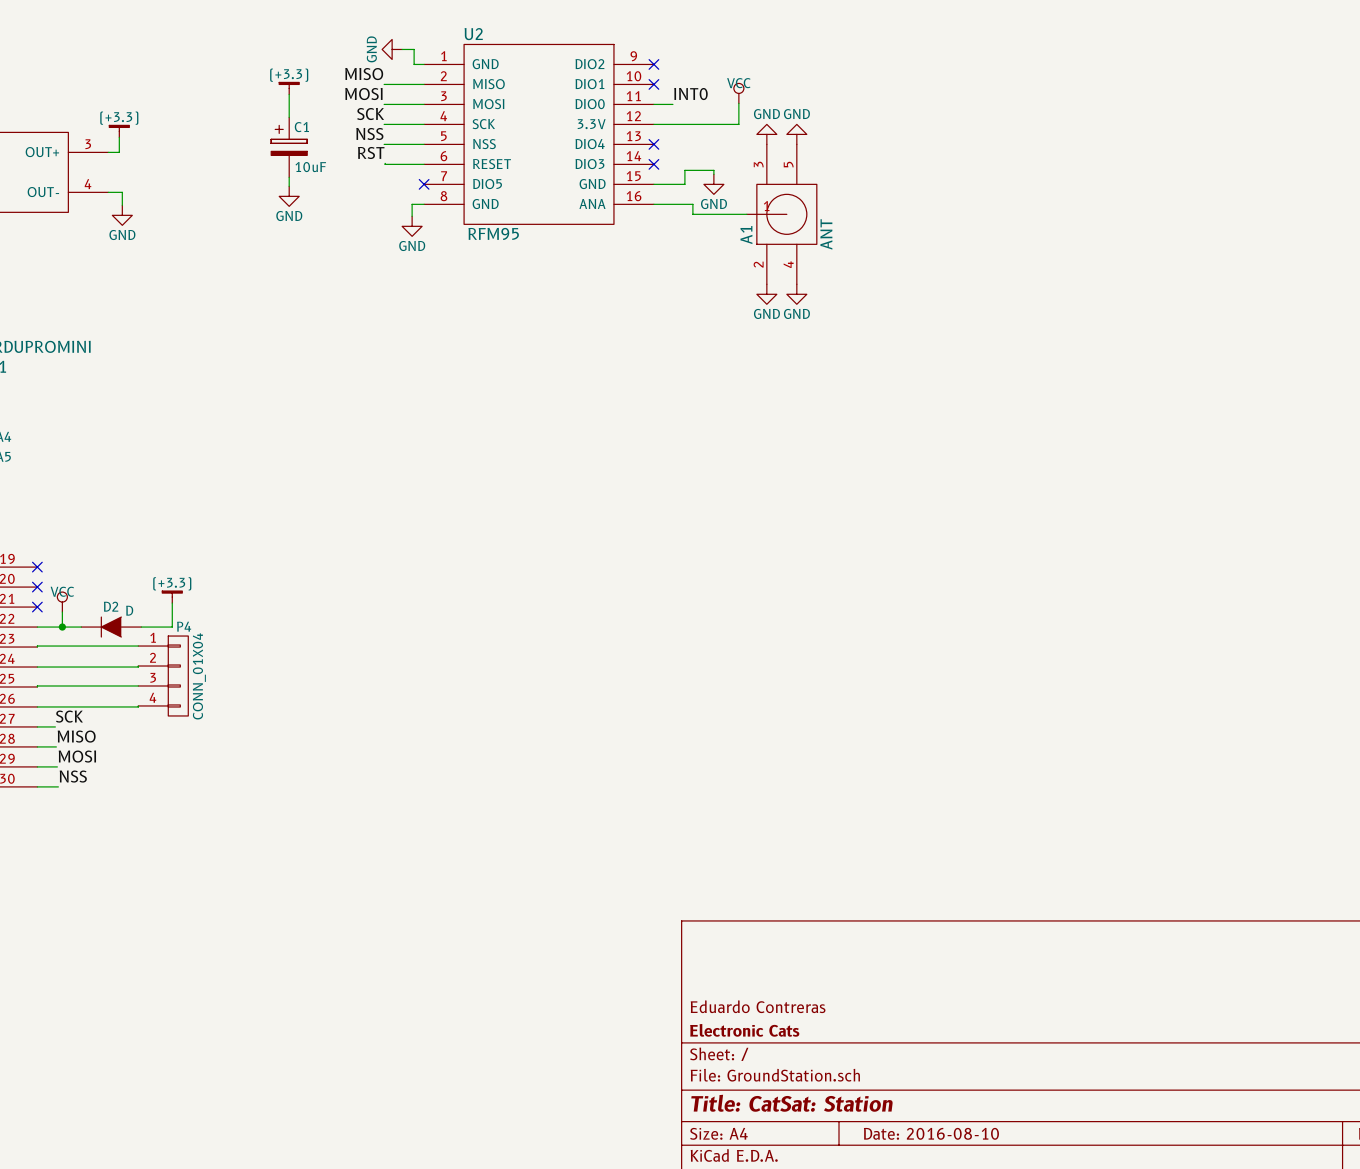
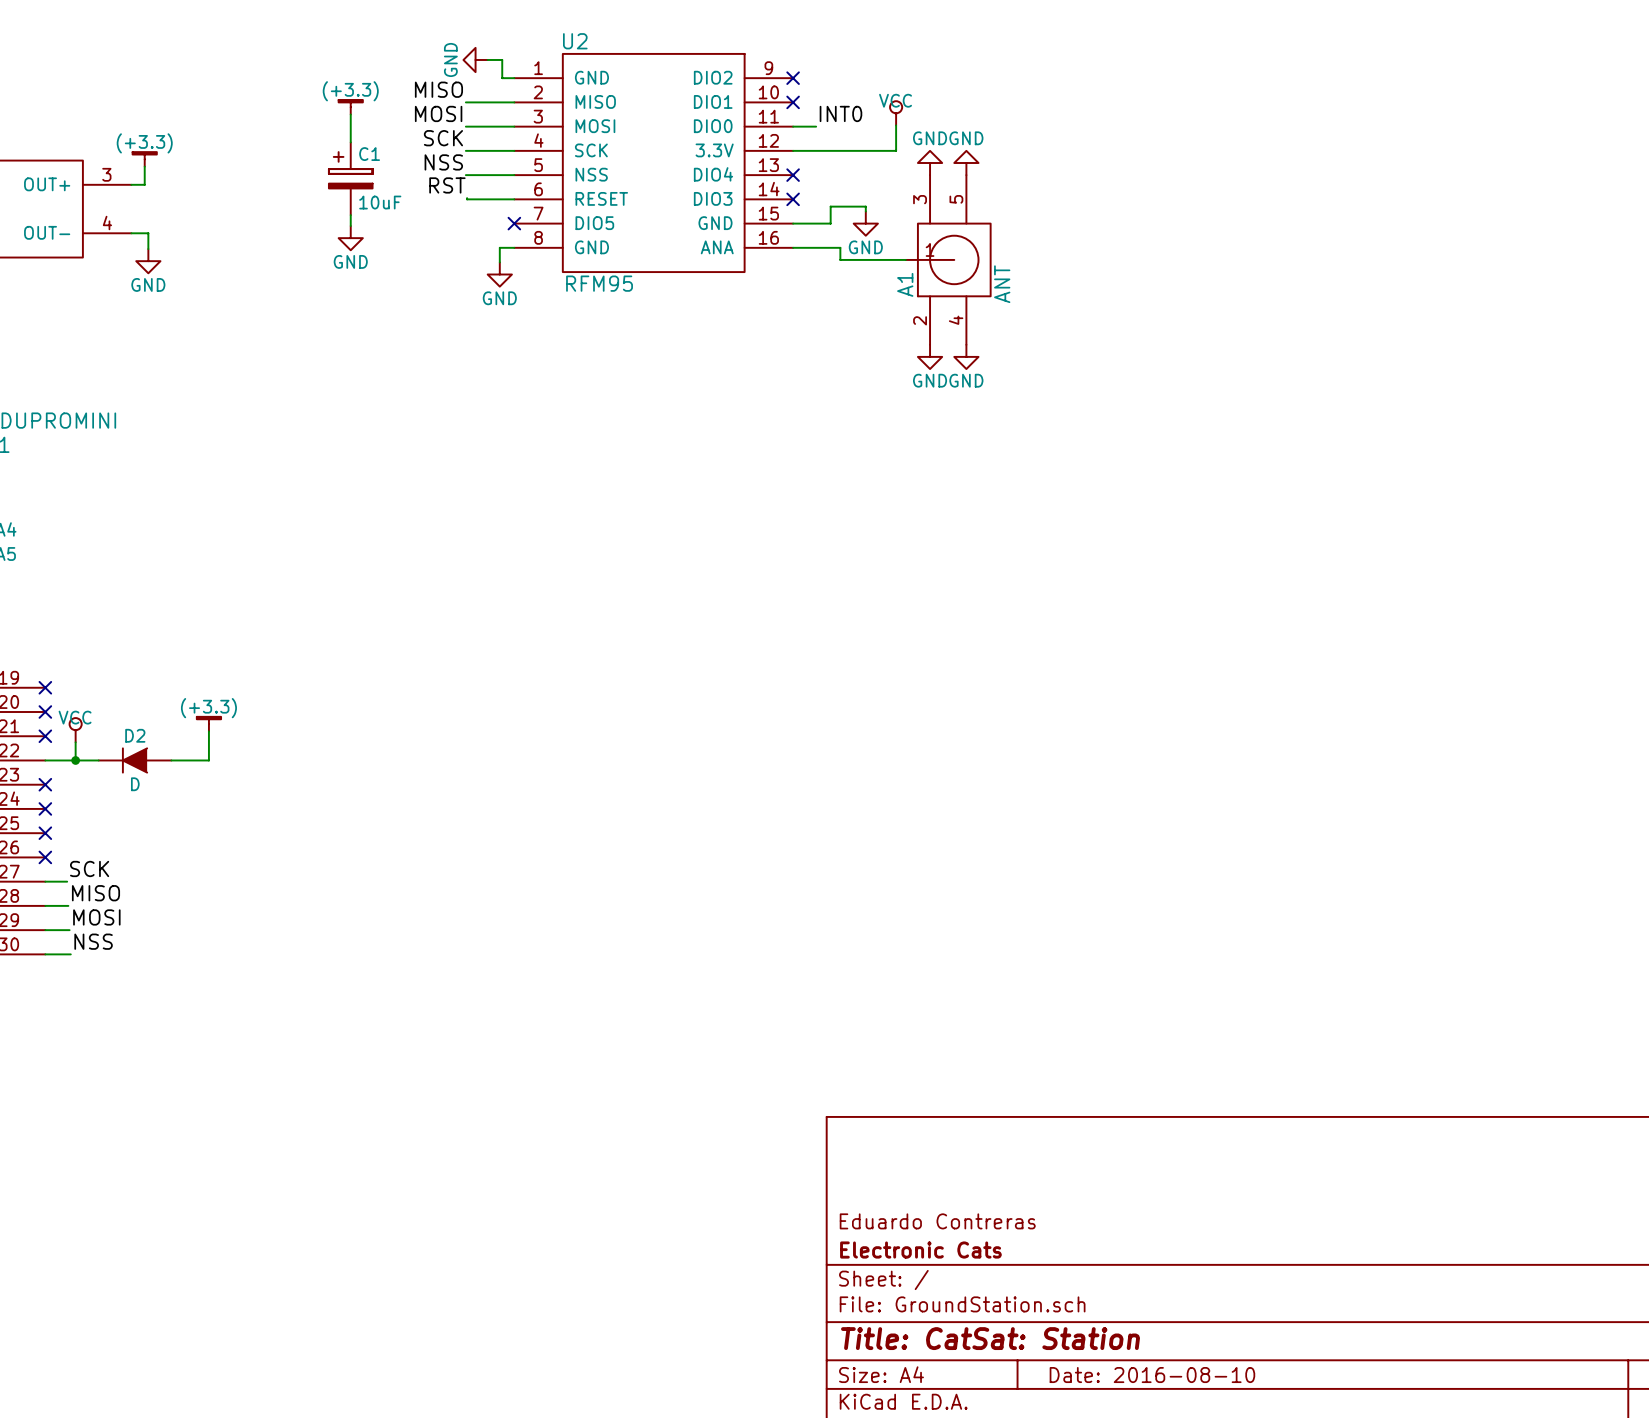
D2 value position: D (129, 610) -> D (135, 784)
wire: (138, 646) (37, 647) -> none
no-connect mark: none -> (45, 784)
wire: (138, 666) (37, 667) -> none
no-connect mark: none -> (45, 808)
P4: CONN_01X04 (163, 676) -> none
wire: (138, 685) (37, 686) -> none
no-connect mark: none -> (45, 833)
wire: (138, 705) (37, 706) -> none
no-connect mark: none -> (45, 857)

